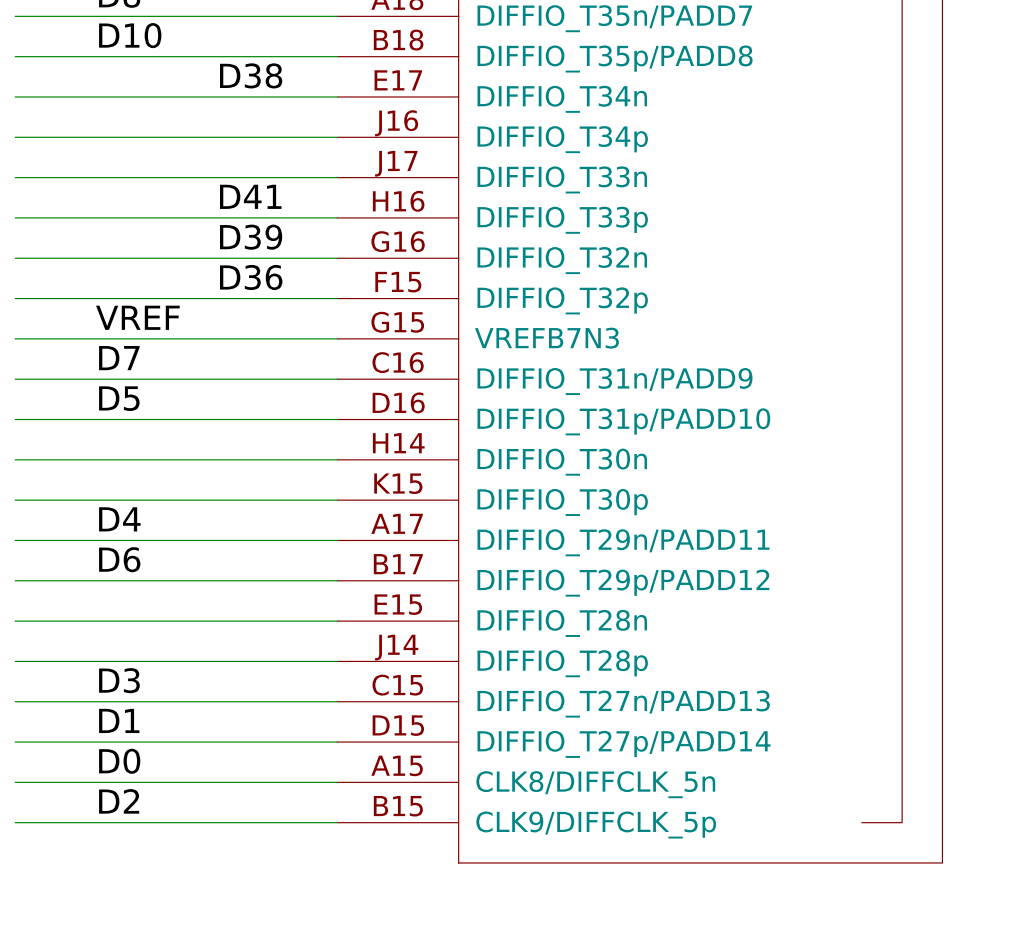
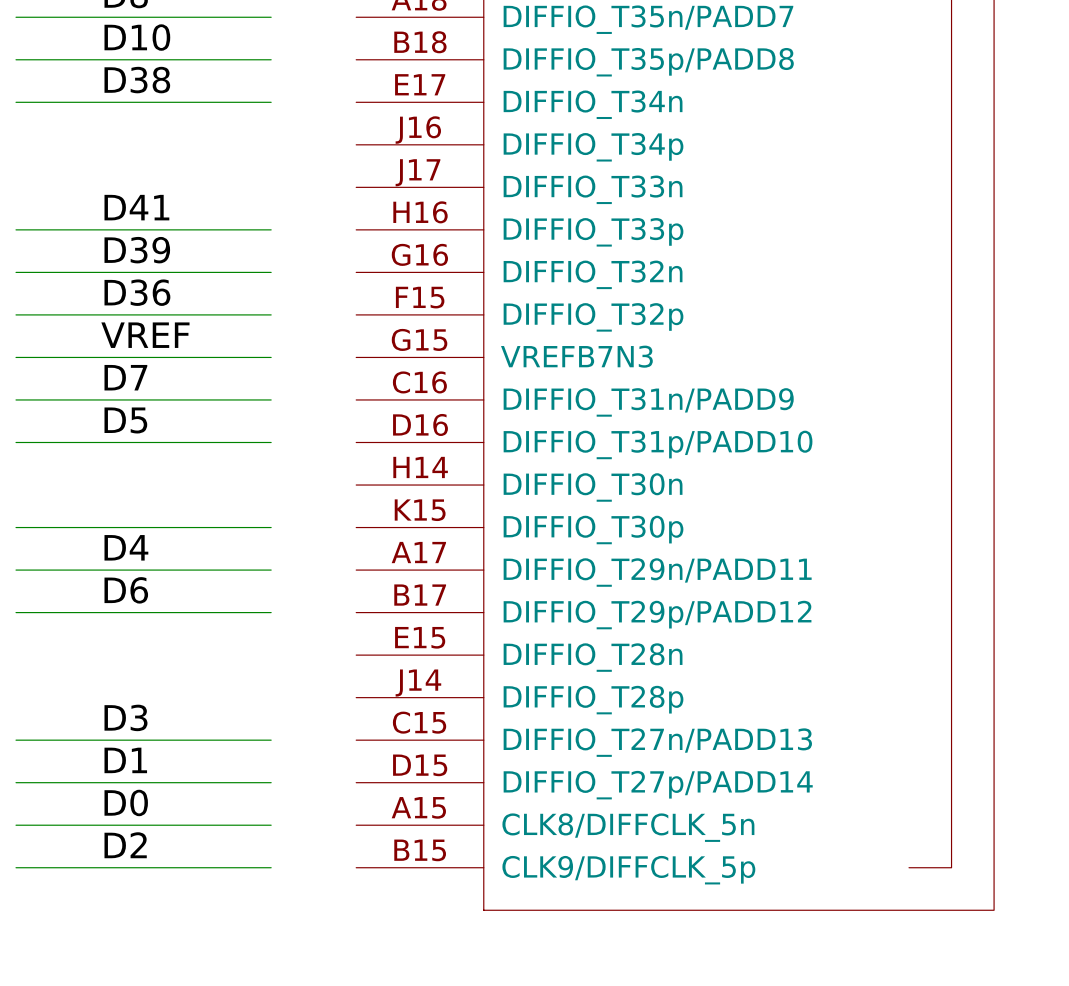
wire: (257, 16) (337, 16) -> none
wire: (257, 56) (337, 56) -> none
label position: D38 (251, 75) -> D38 (137, 80)
wire: (257, 96) (337, 96) -> none
wire: (15, 137) (337, 137) -> none
wire: (15, 177) (337, 177) -> none
label position: D41 (250, 196) -> D41 (136, 207)
wire: (257, 217) (337, 217) -> none
label position: D39 (251, 237) -> D39 (137, 250)
wire: (257, 258) (337, 258) -> none
label position: D36 (251, 277) -> D36 (137, 292)
wire: (257, 298) (337, 298) -> none
wire: (257, 338) (337, 338) -> none
wire: (257, 379) (337, 379) -> none
wire: (257, 419) (337, 419) -> none
wire: (15, 459) (337, 459) -> none
wire: (257, 500) (337, 500) -> none
wire: (257, 540) (337, 540) -> none
wire: (257, 580) (337, 580) -> none
wire: (15, 621) (337, 621) -> none
wire: (15, 661) (337, 661) -> none
wire: (257, 701) (337, 701) -> none
wire: (257, 742) (337, 742) -> none
wire: (257, 782) (337, 782) -> none
wire: (257, 822) (337, 822) -> none

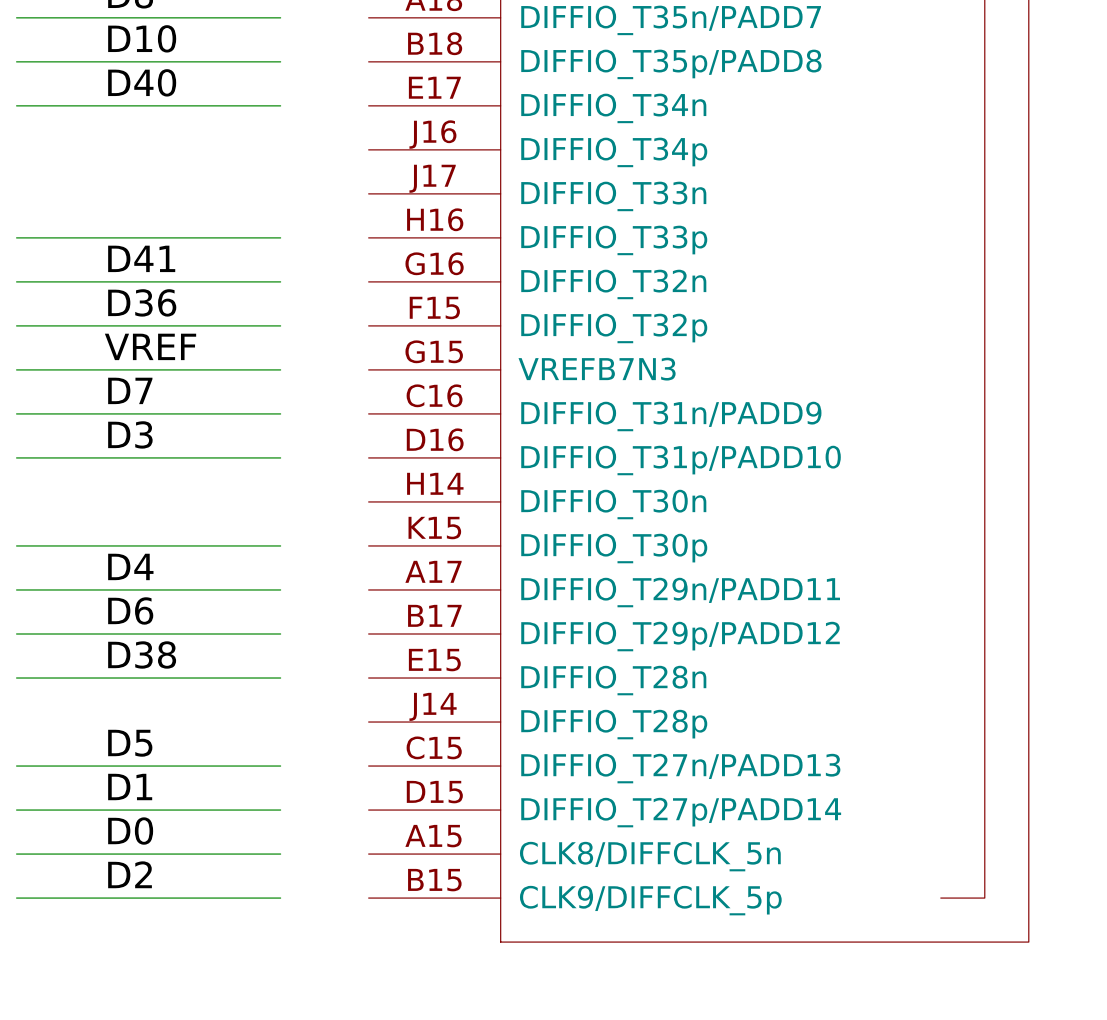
label: D38 (137, 80) -> D40 (142, 82)
label: D41 (136, 207) -> none
label: D39 (137, 250) -> D41 (141, 258)
label: D5 (125, 420) -> D3 (130, 434)
label: none -> D38 (142, 654)
wire: none -> (16, 678) (280, 678)
label: D3 (125, 717) -> D5 (130, 743)

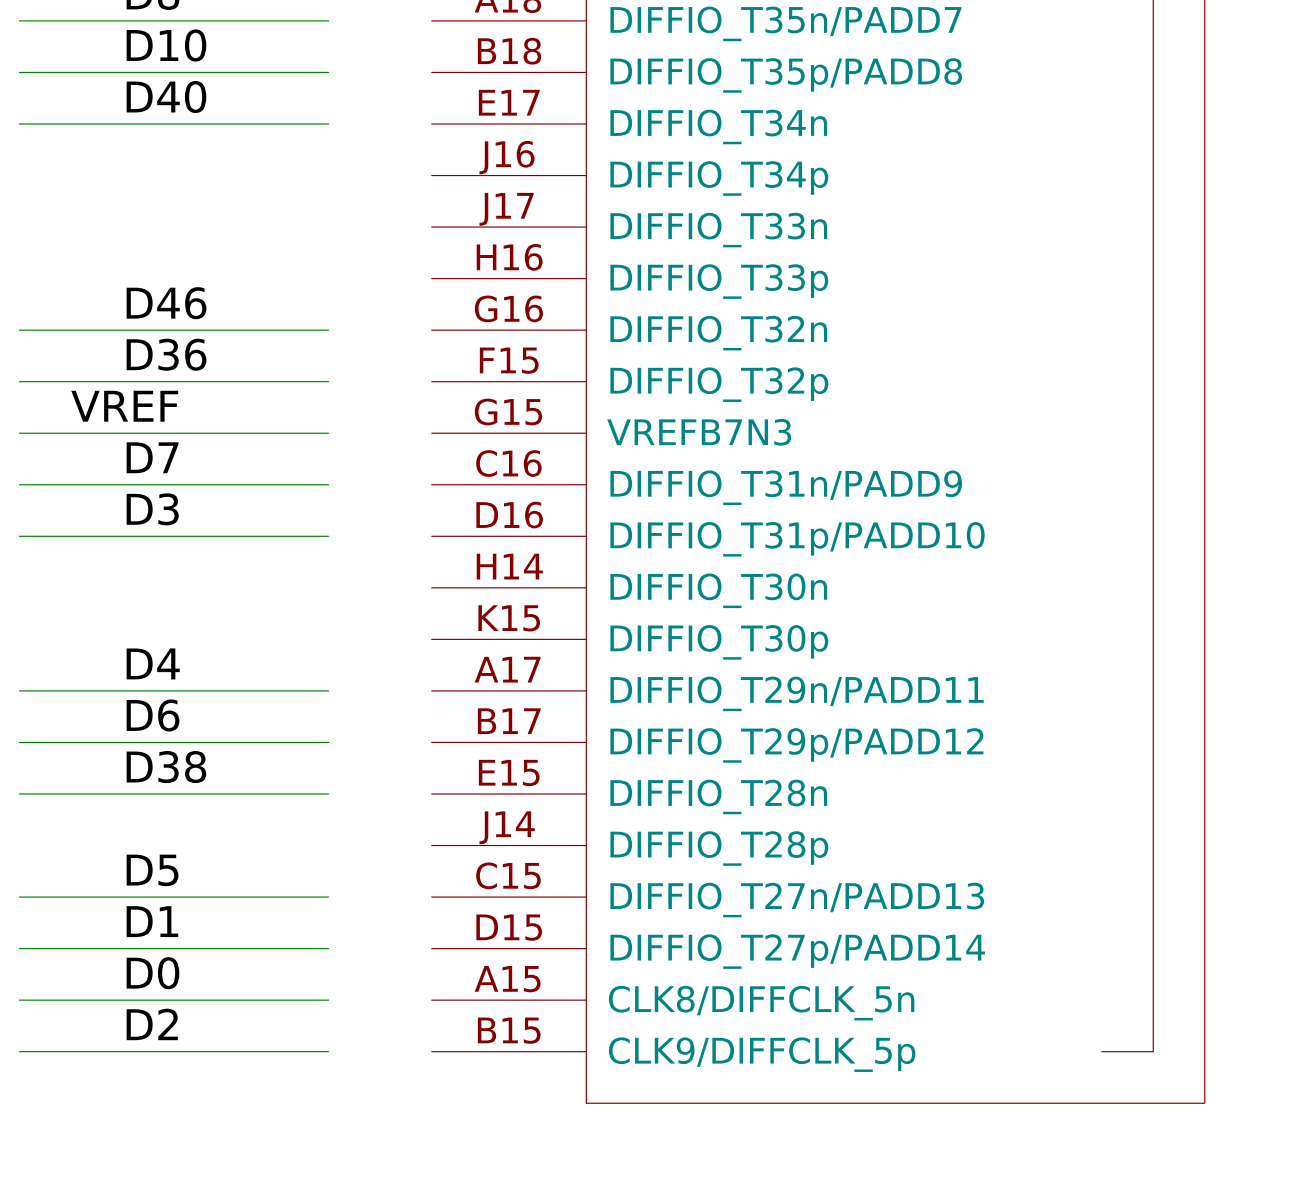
wire: (16, 237) (280, 237) -> none
label: D41 (141, 258) -> D46 (166, 303)
label position: VREF (150, 346) -> VREF (124, 406)
wire: (16, 545) (280, 545) -> none

